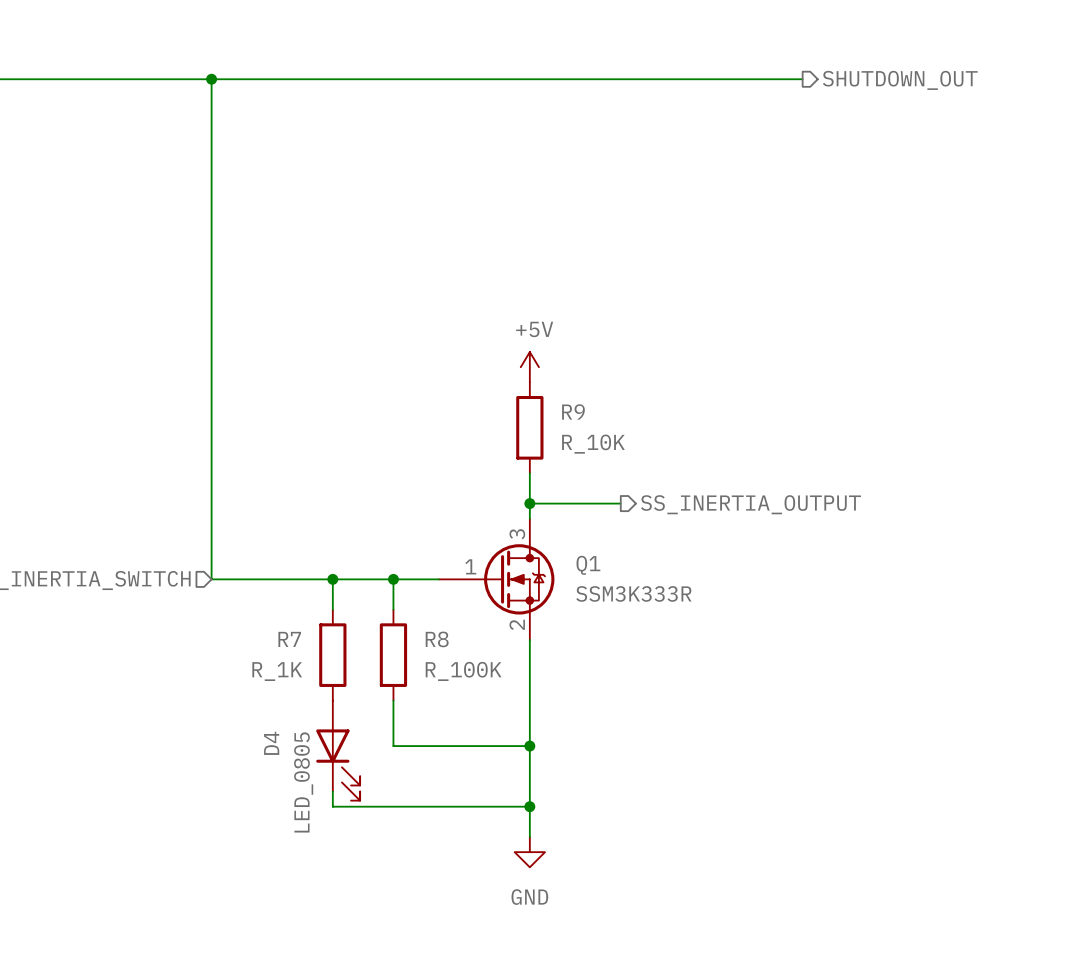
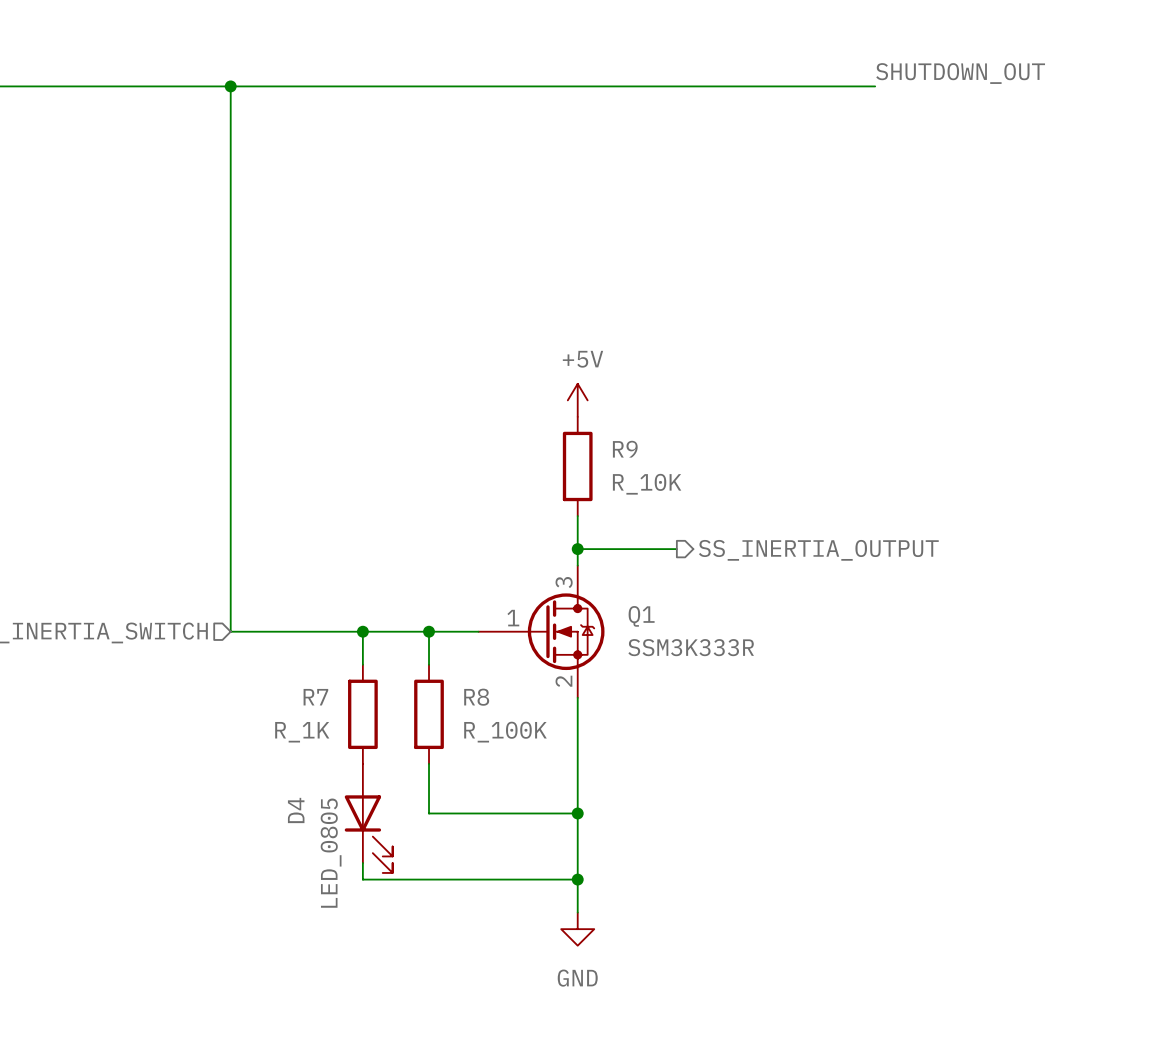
label: none -> SHUTDOWN_OUT (960, 73)
hierarchical label: SHUTDOWN_OUT (900, 80) -> none

